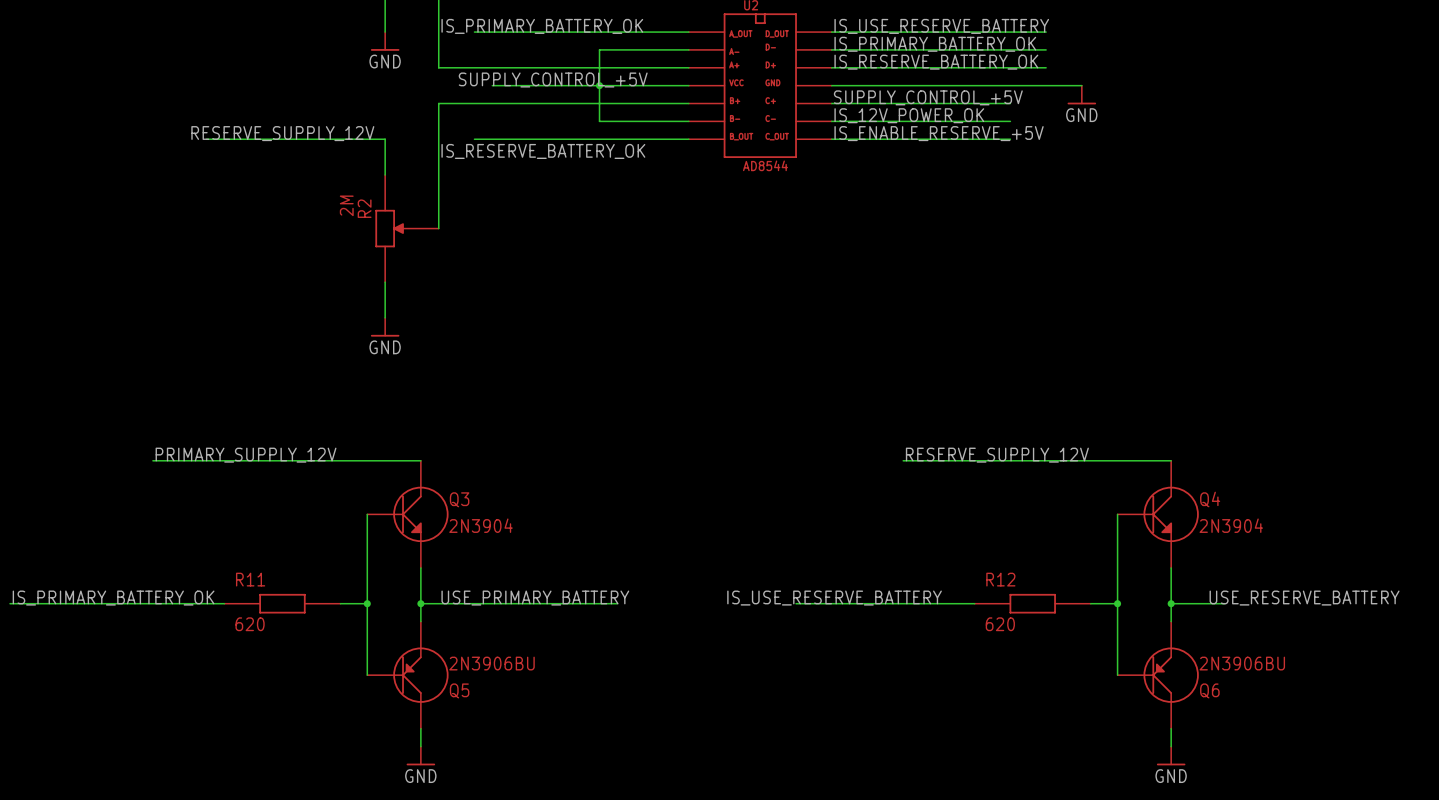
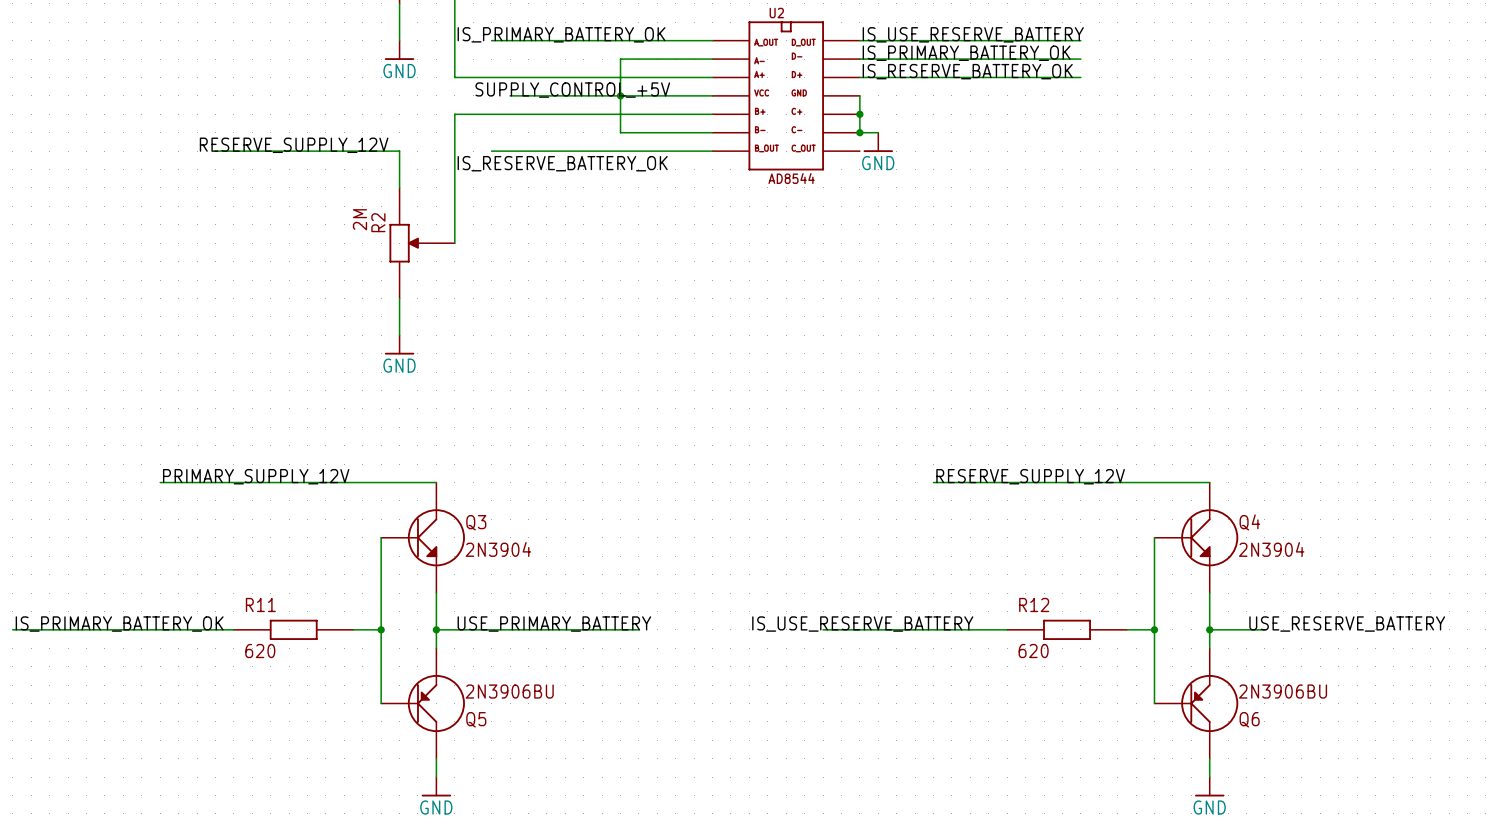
wire: (831, 85) (1081, 85) -> (859, 95) (859, 132)
power symbol: GND (1081, 95) -> none
label: SUPPLY_CONTROL_+5V (928, 97) -> none
wire: (831, 103) (1010, 103) -> none
junction: none -> (859, 114)
label: IS_12V_POWER_OK (909, 115) -> none
junction: none -> (859, 132)
wire: (849, 121) (1010, 121) -> none
power symbol: none -> GND (878, 142)
label: IS_ENABLE_RESERVE_+5V (939, 133) -> none
wire: (831, 139) (1010, 139) -> none

